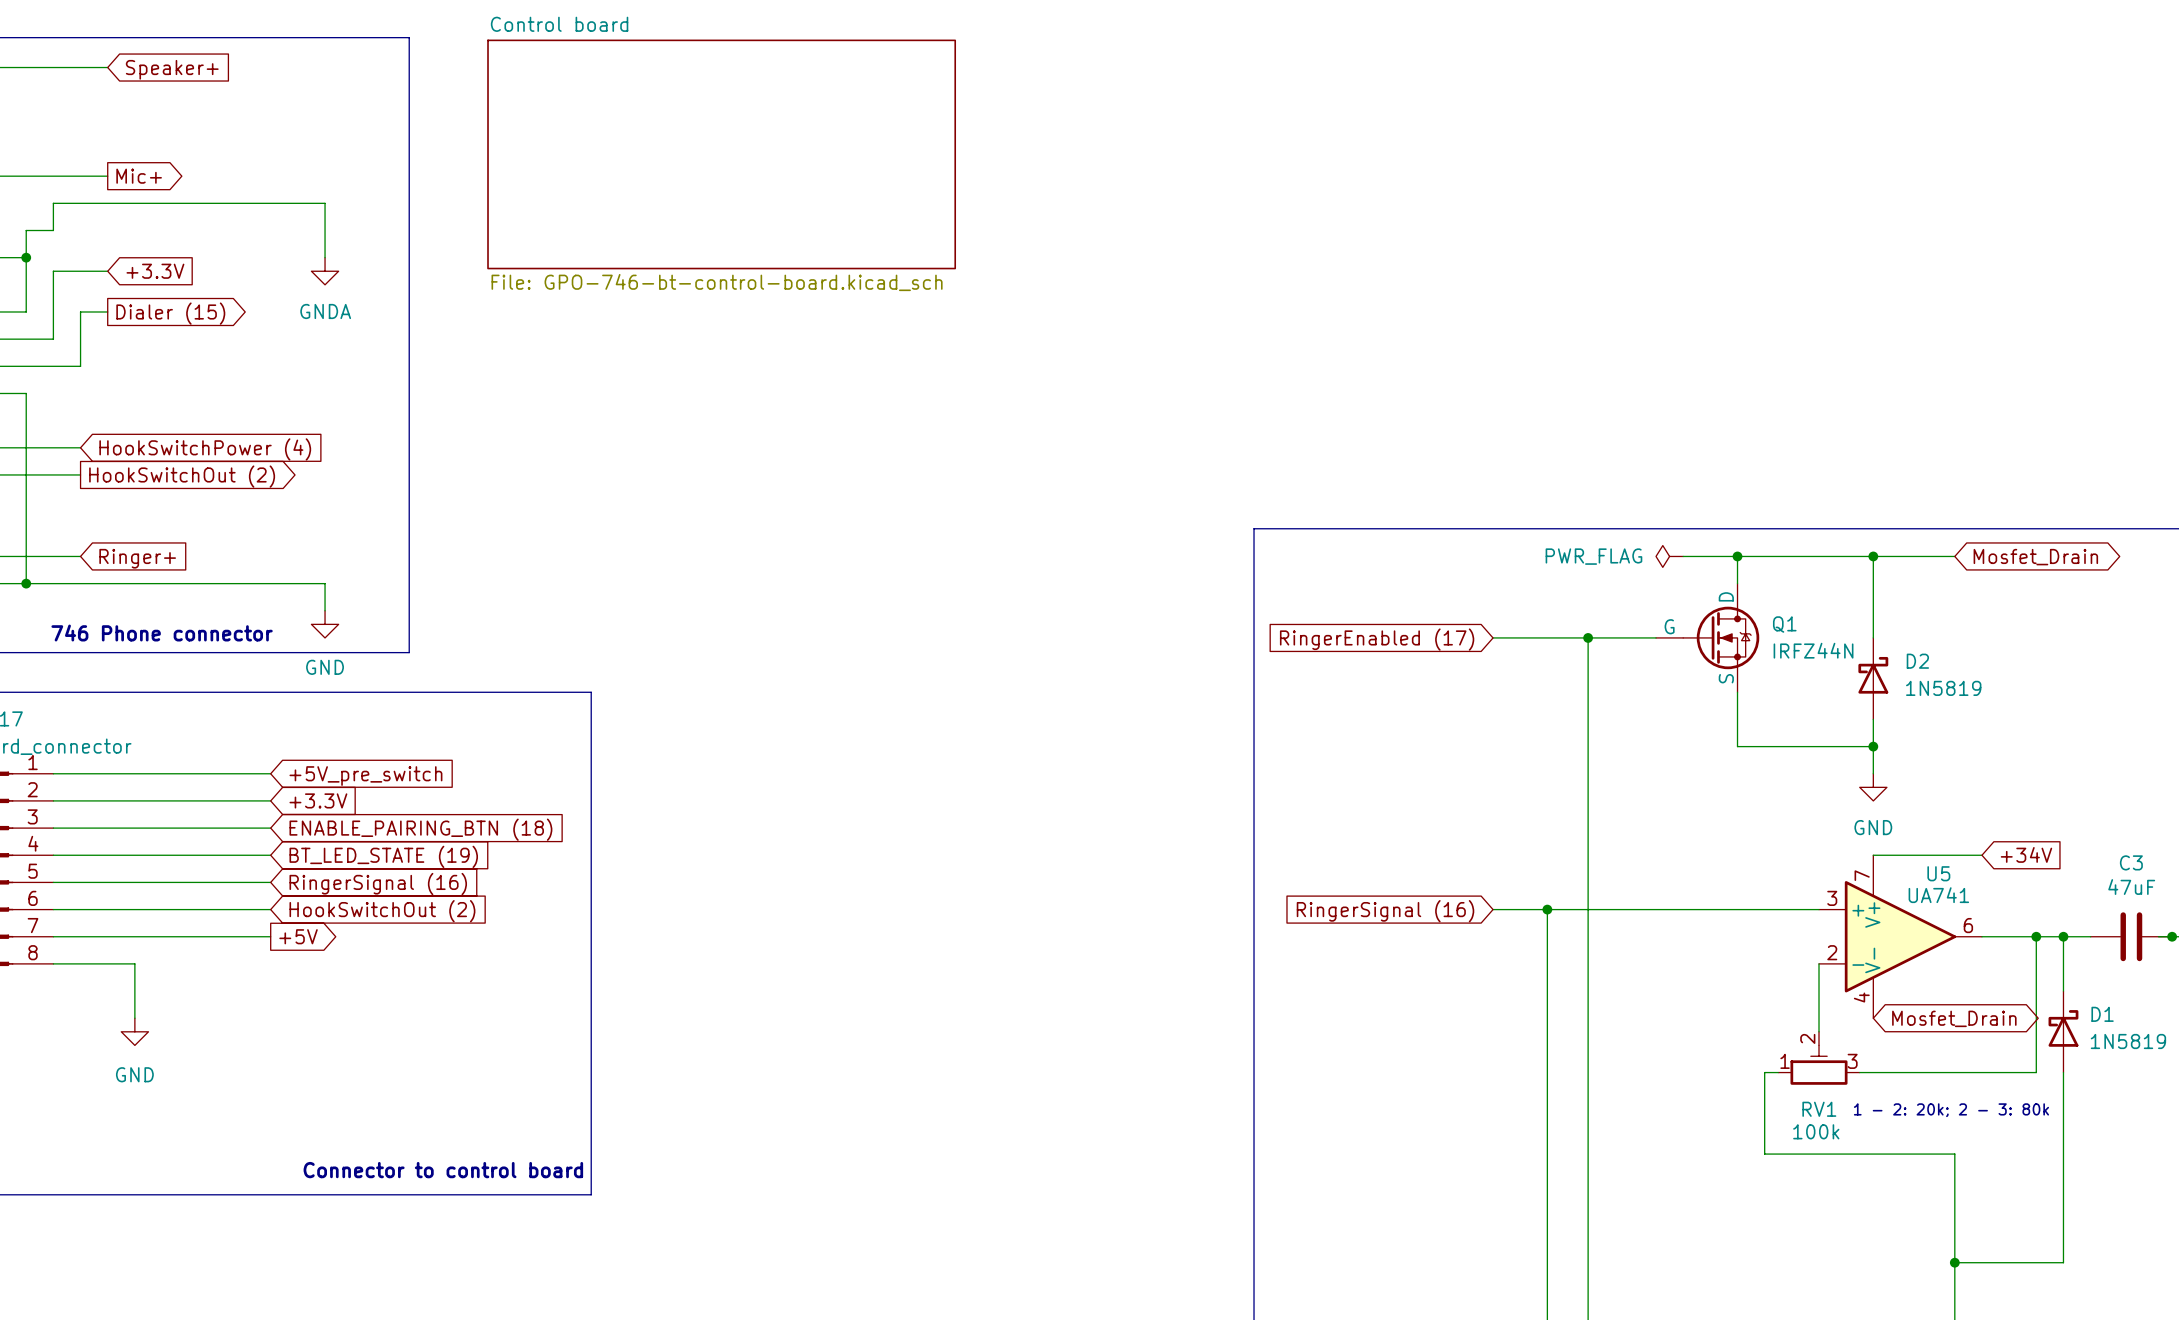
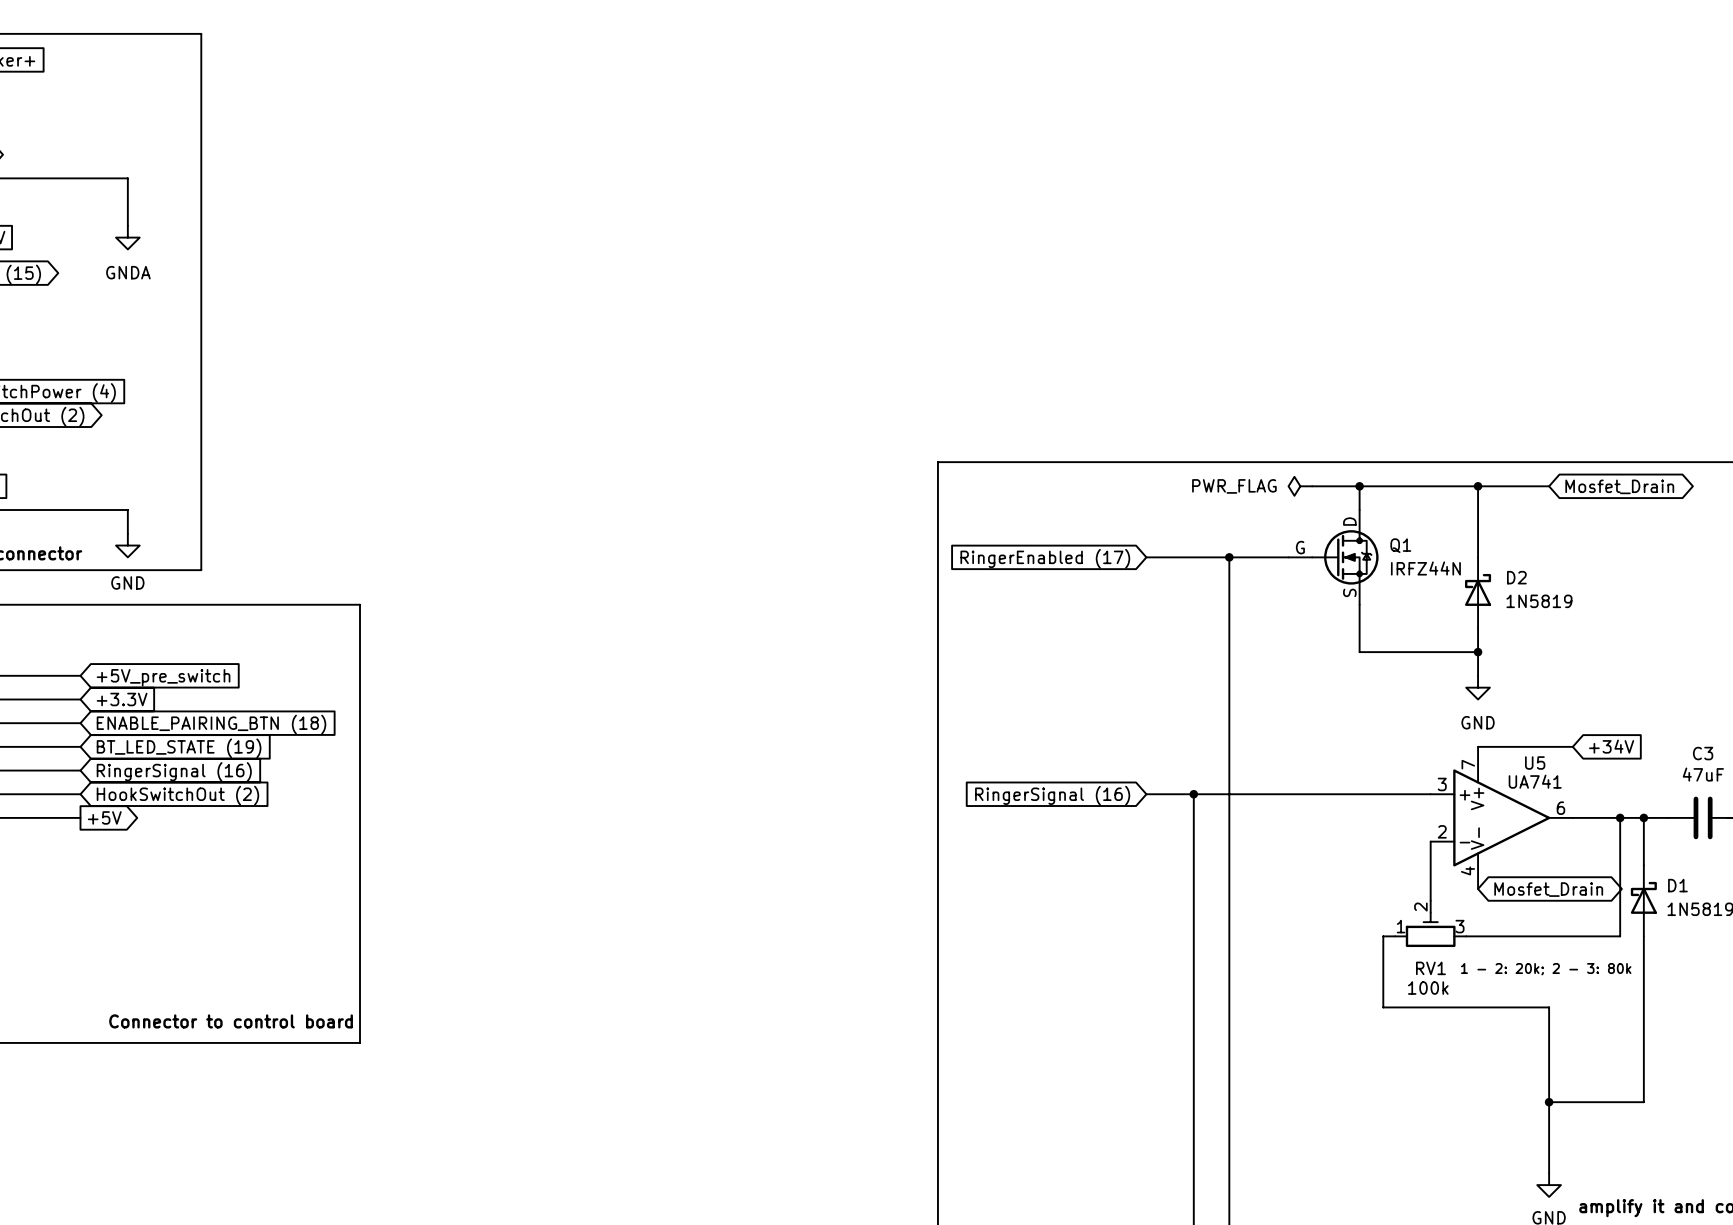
sheet Control board: File: GPO-746-bt-control-board.kicad_sch (721, 154) -> none

